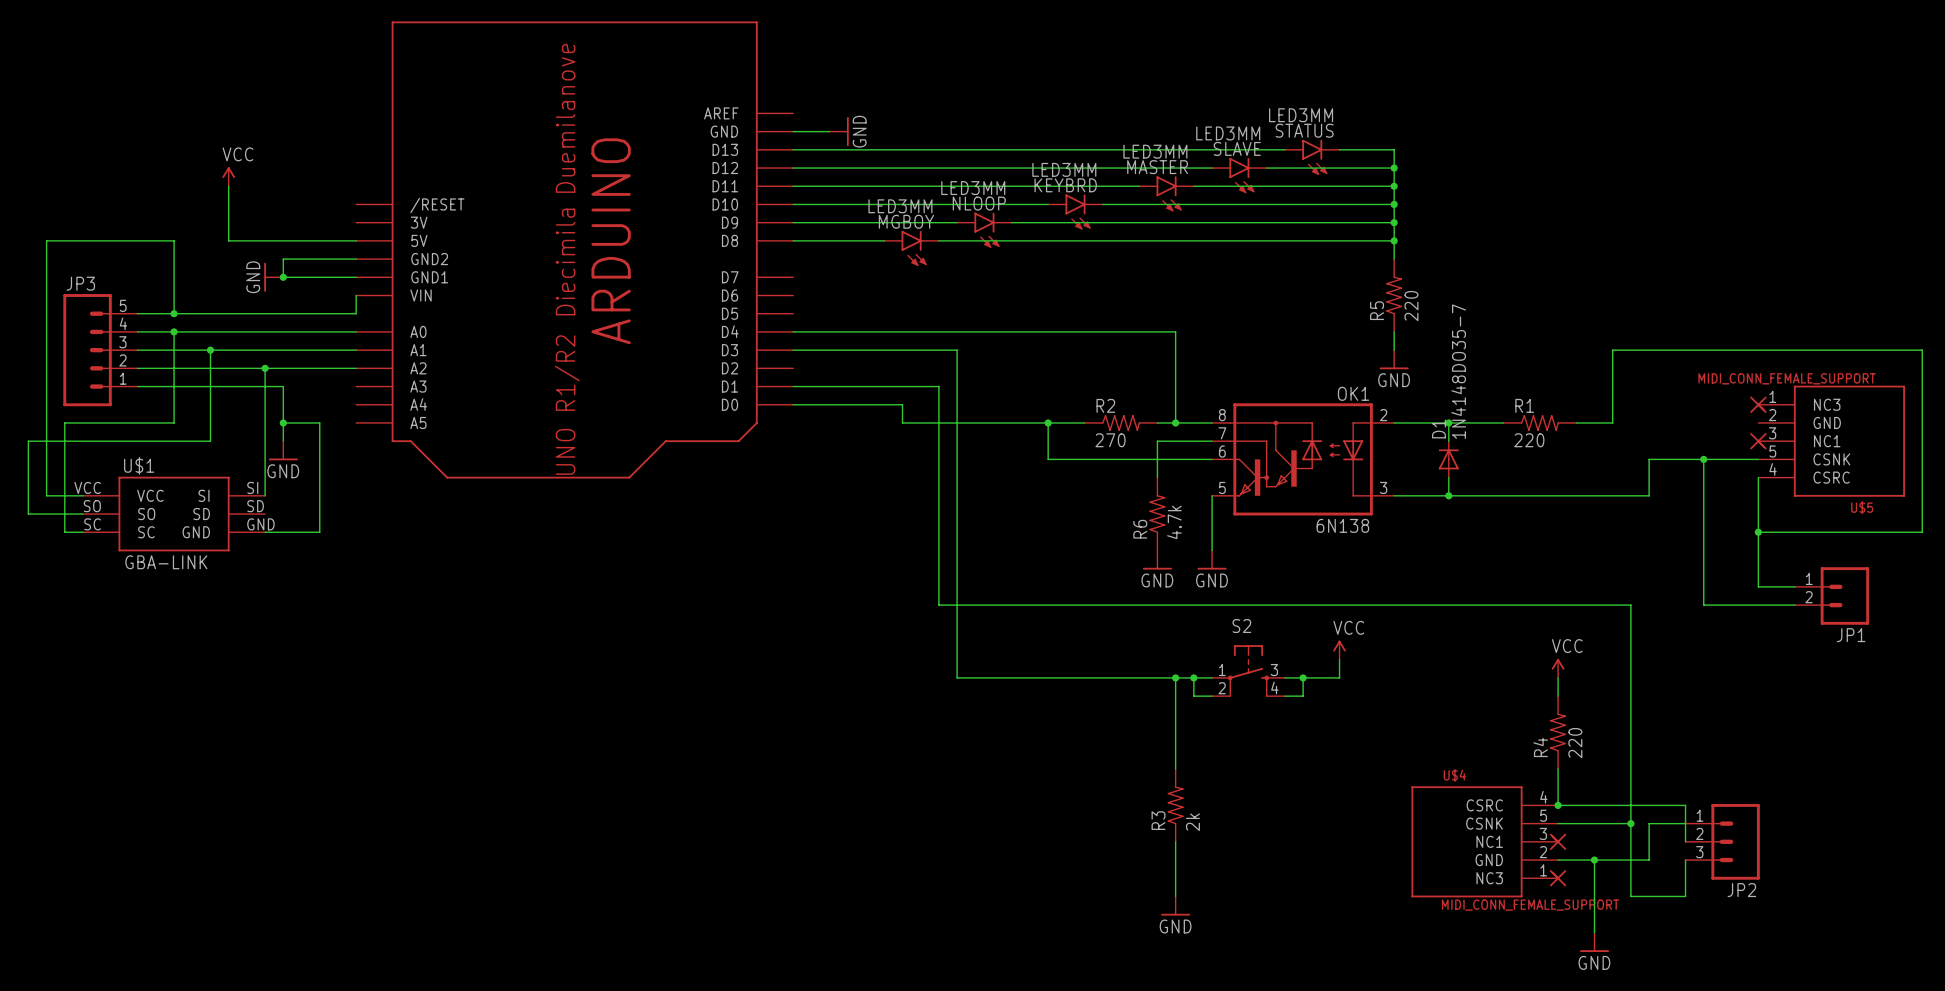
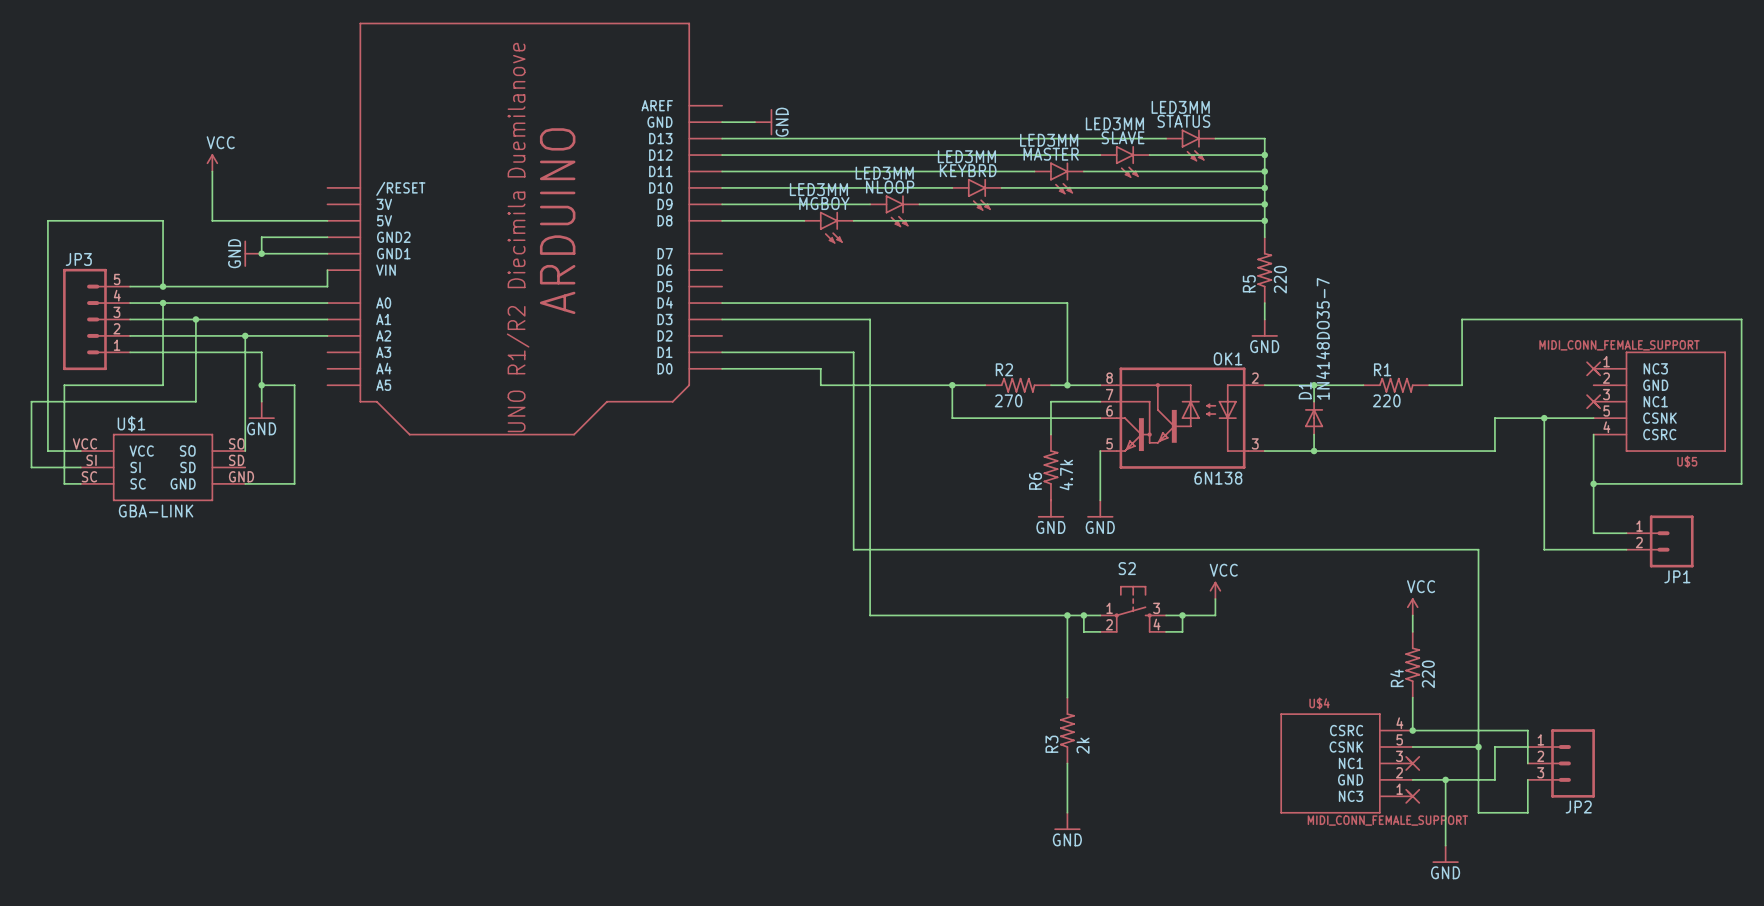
U$1 pin number: SI (252, 487) -> SO (236, 443)
U$1 pin name: SI (204, 495) -> SO (187, 451)
U$1 pin number: SO (92, 506) -> SI (91, 460)
U$1 pin name: SO (146, 514) -> SI (135, 467)

